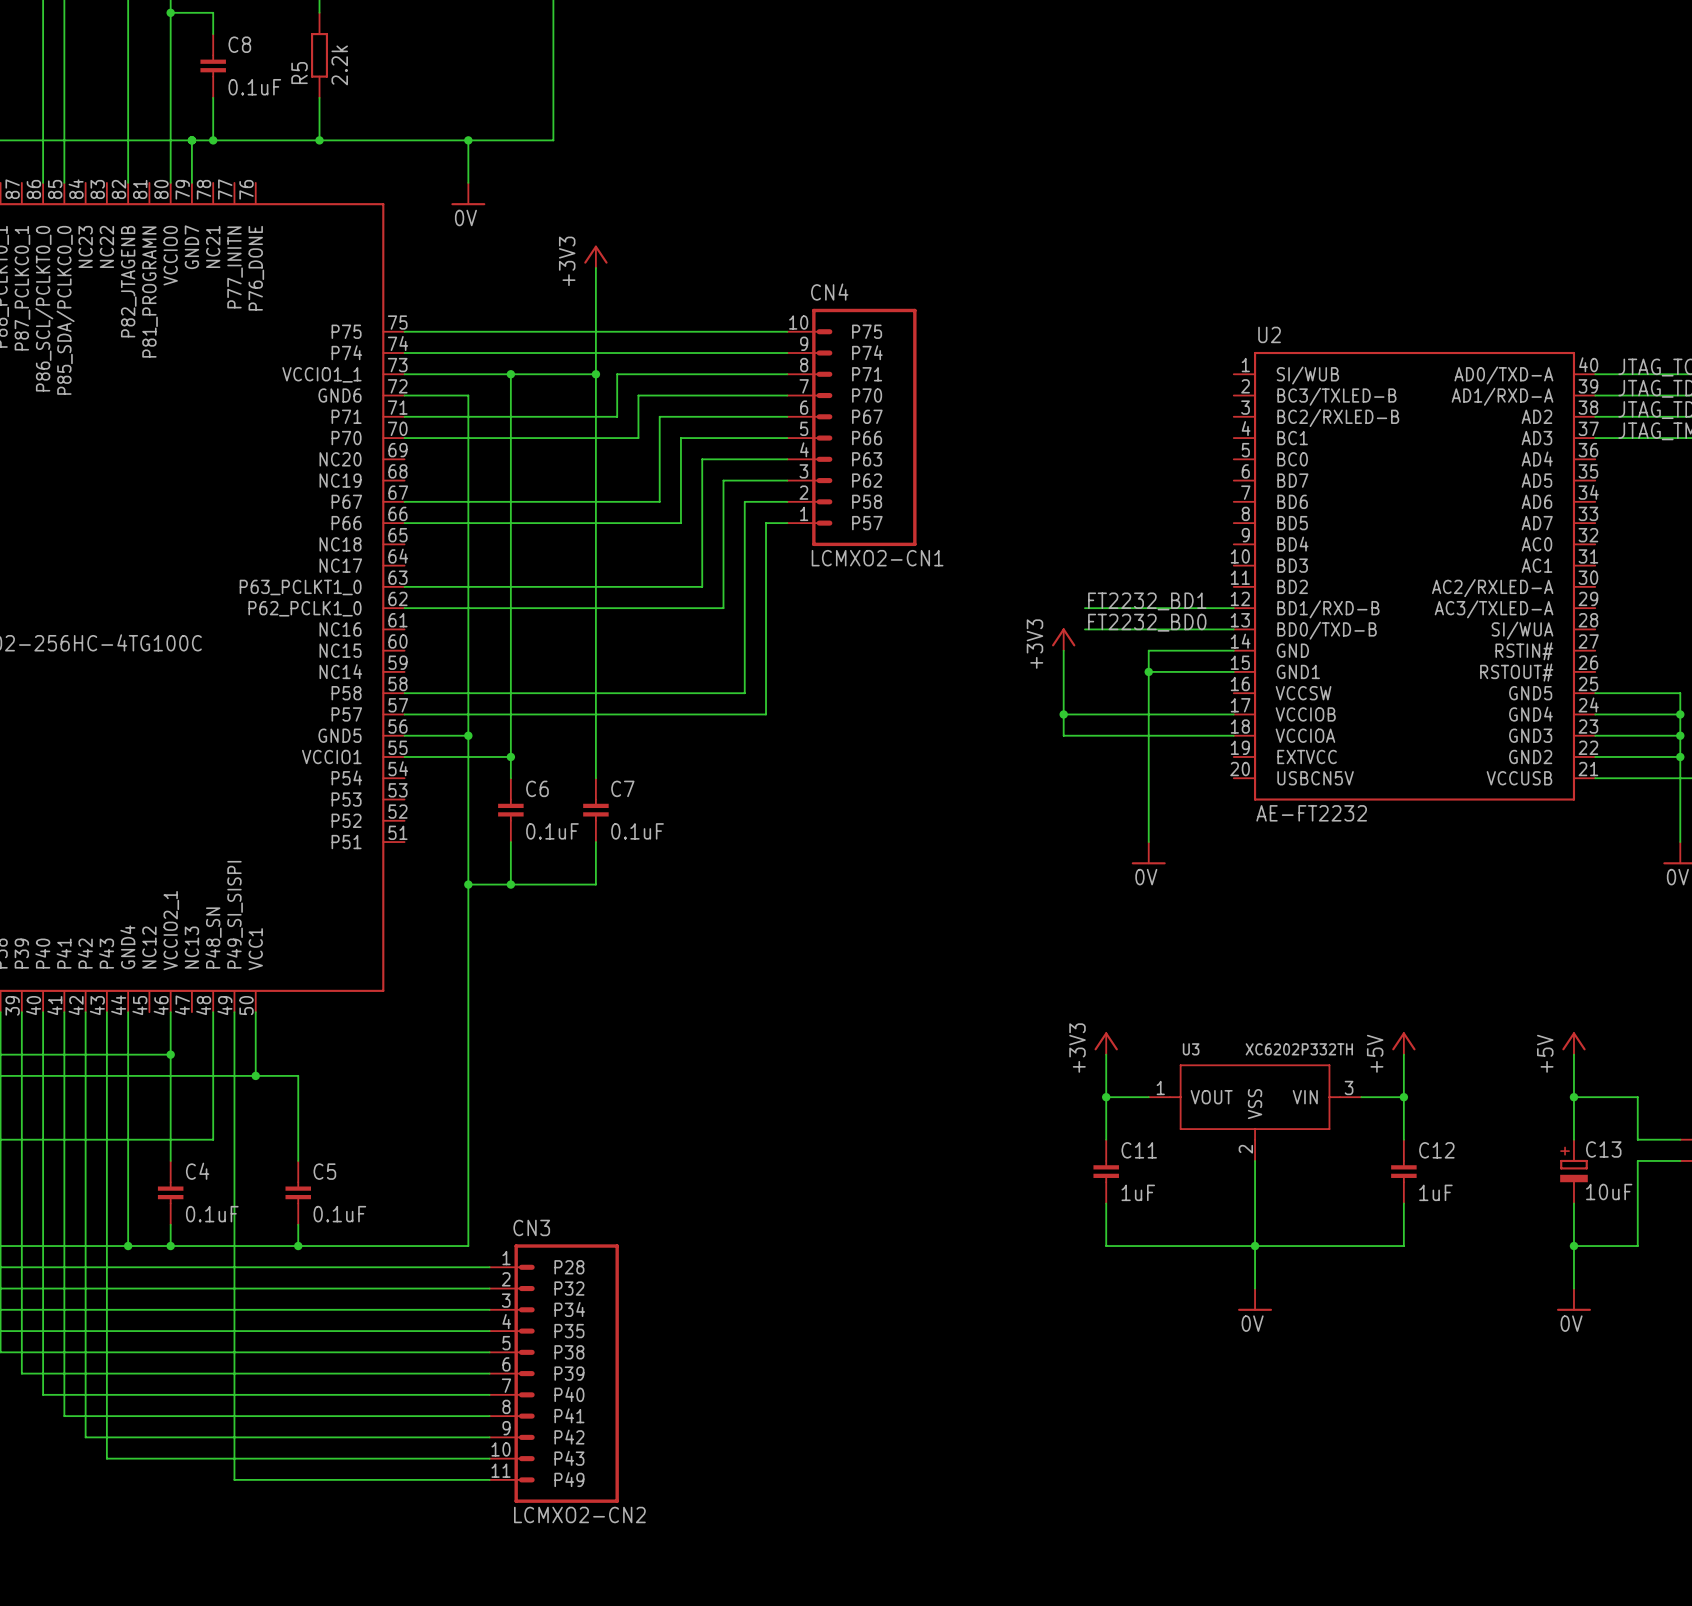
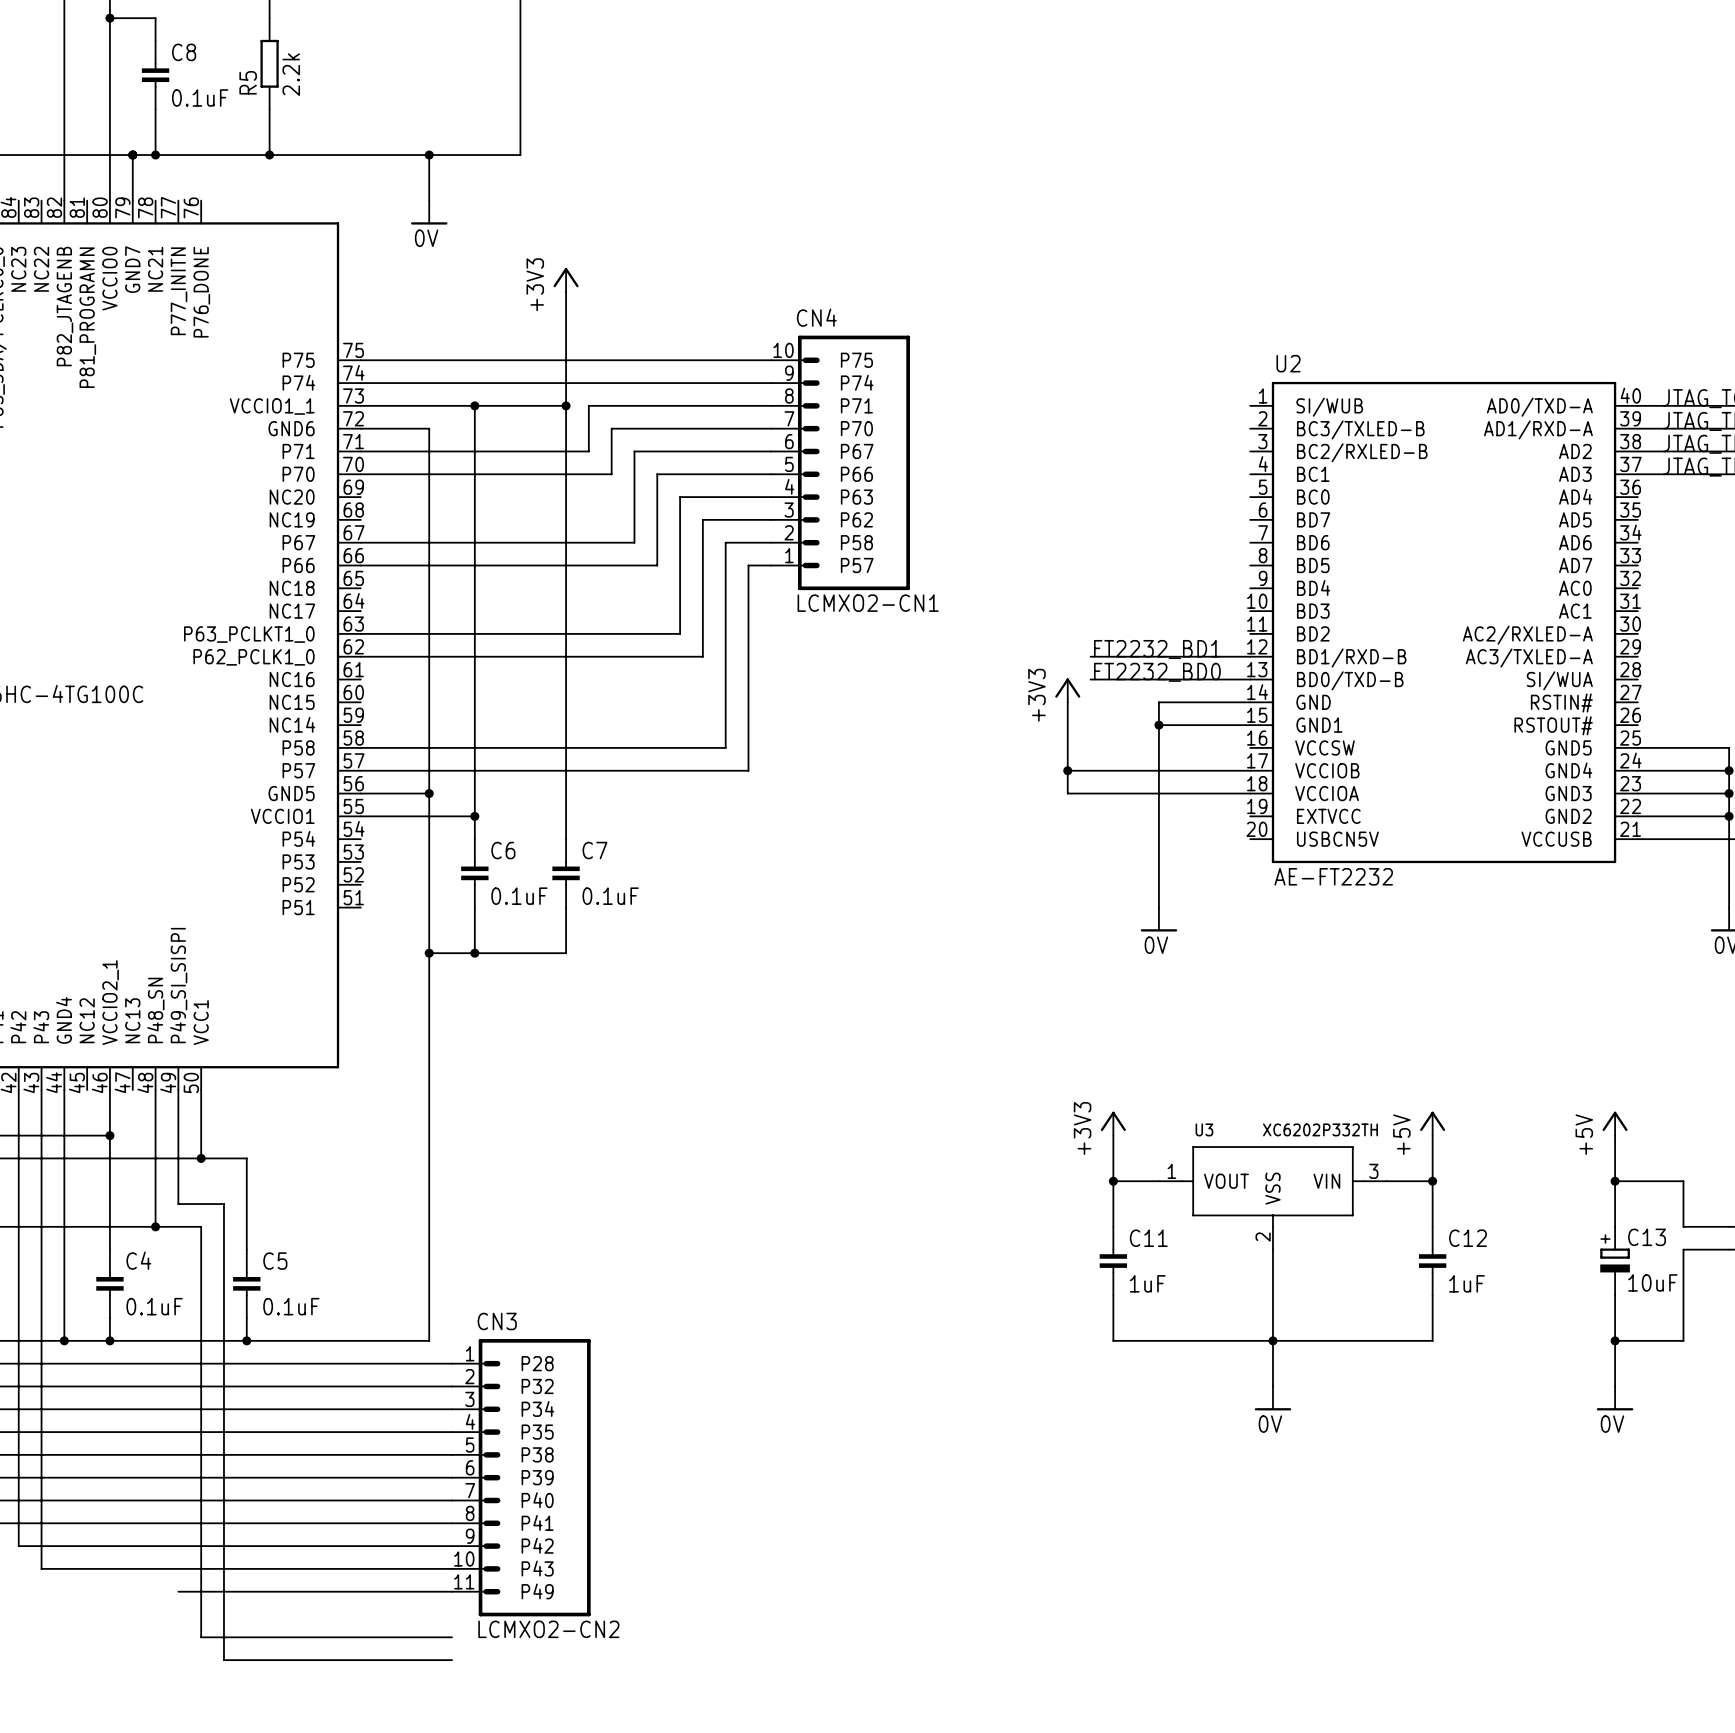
wire: (234, 1118) (234, 1479) -> (178, 1204) (223, 1204) (223, 1660) (452, 1660)
wire: none -> (155, 1226) (201, 1226) (201, 1637) (452, 1637)
junction: none -> (155, 1226)

